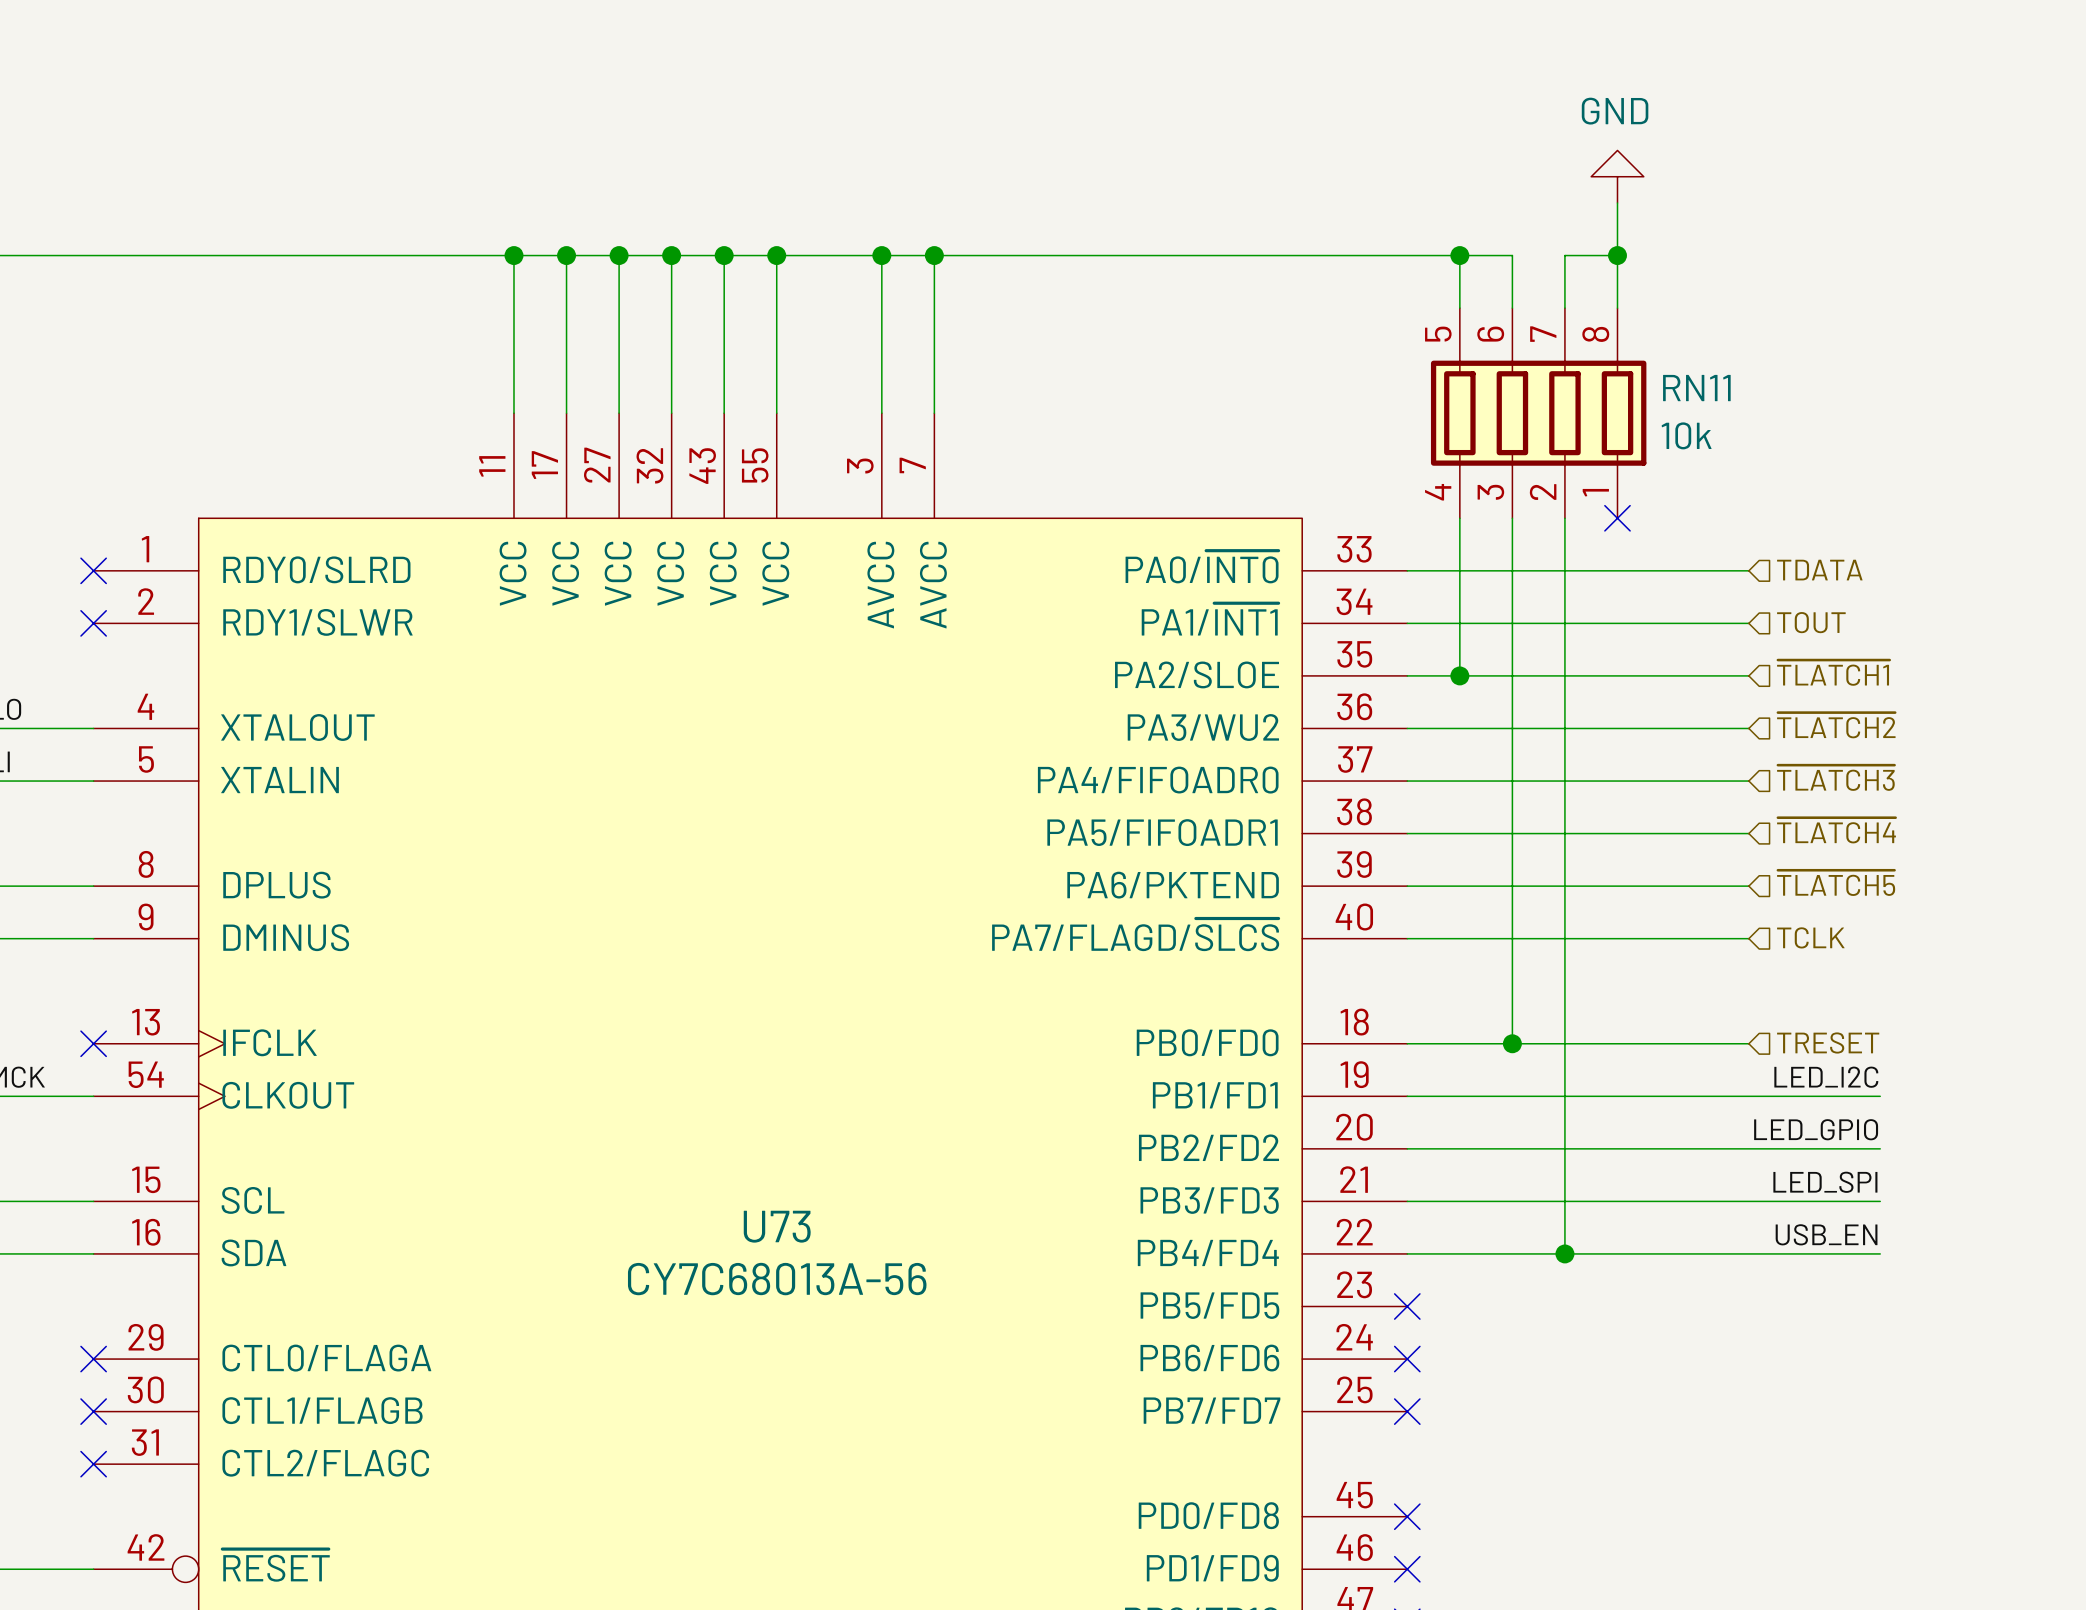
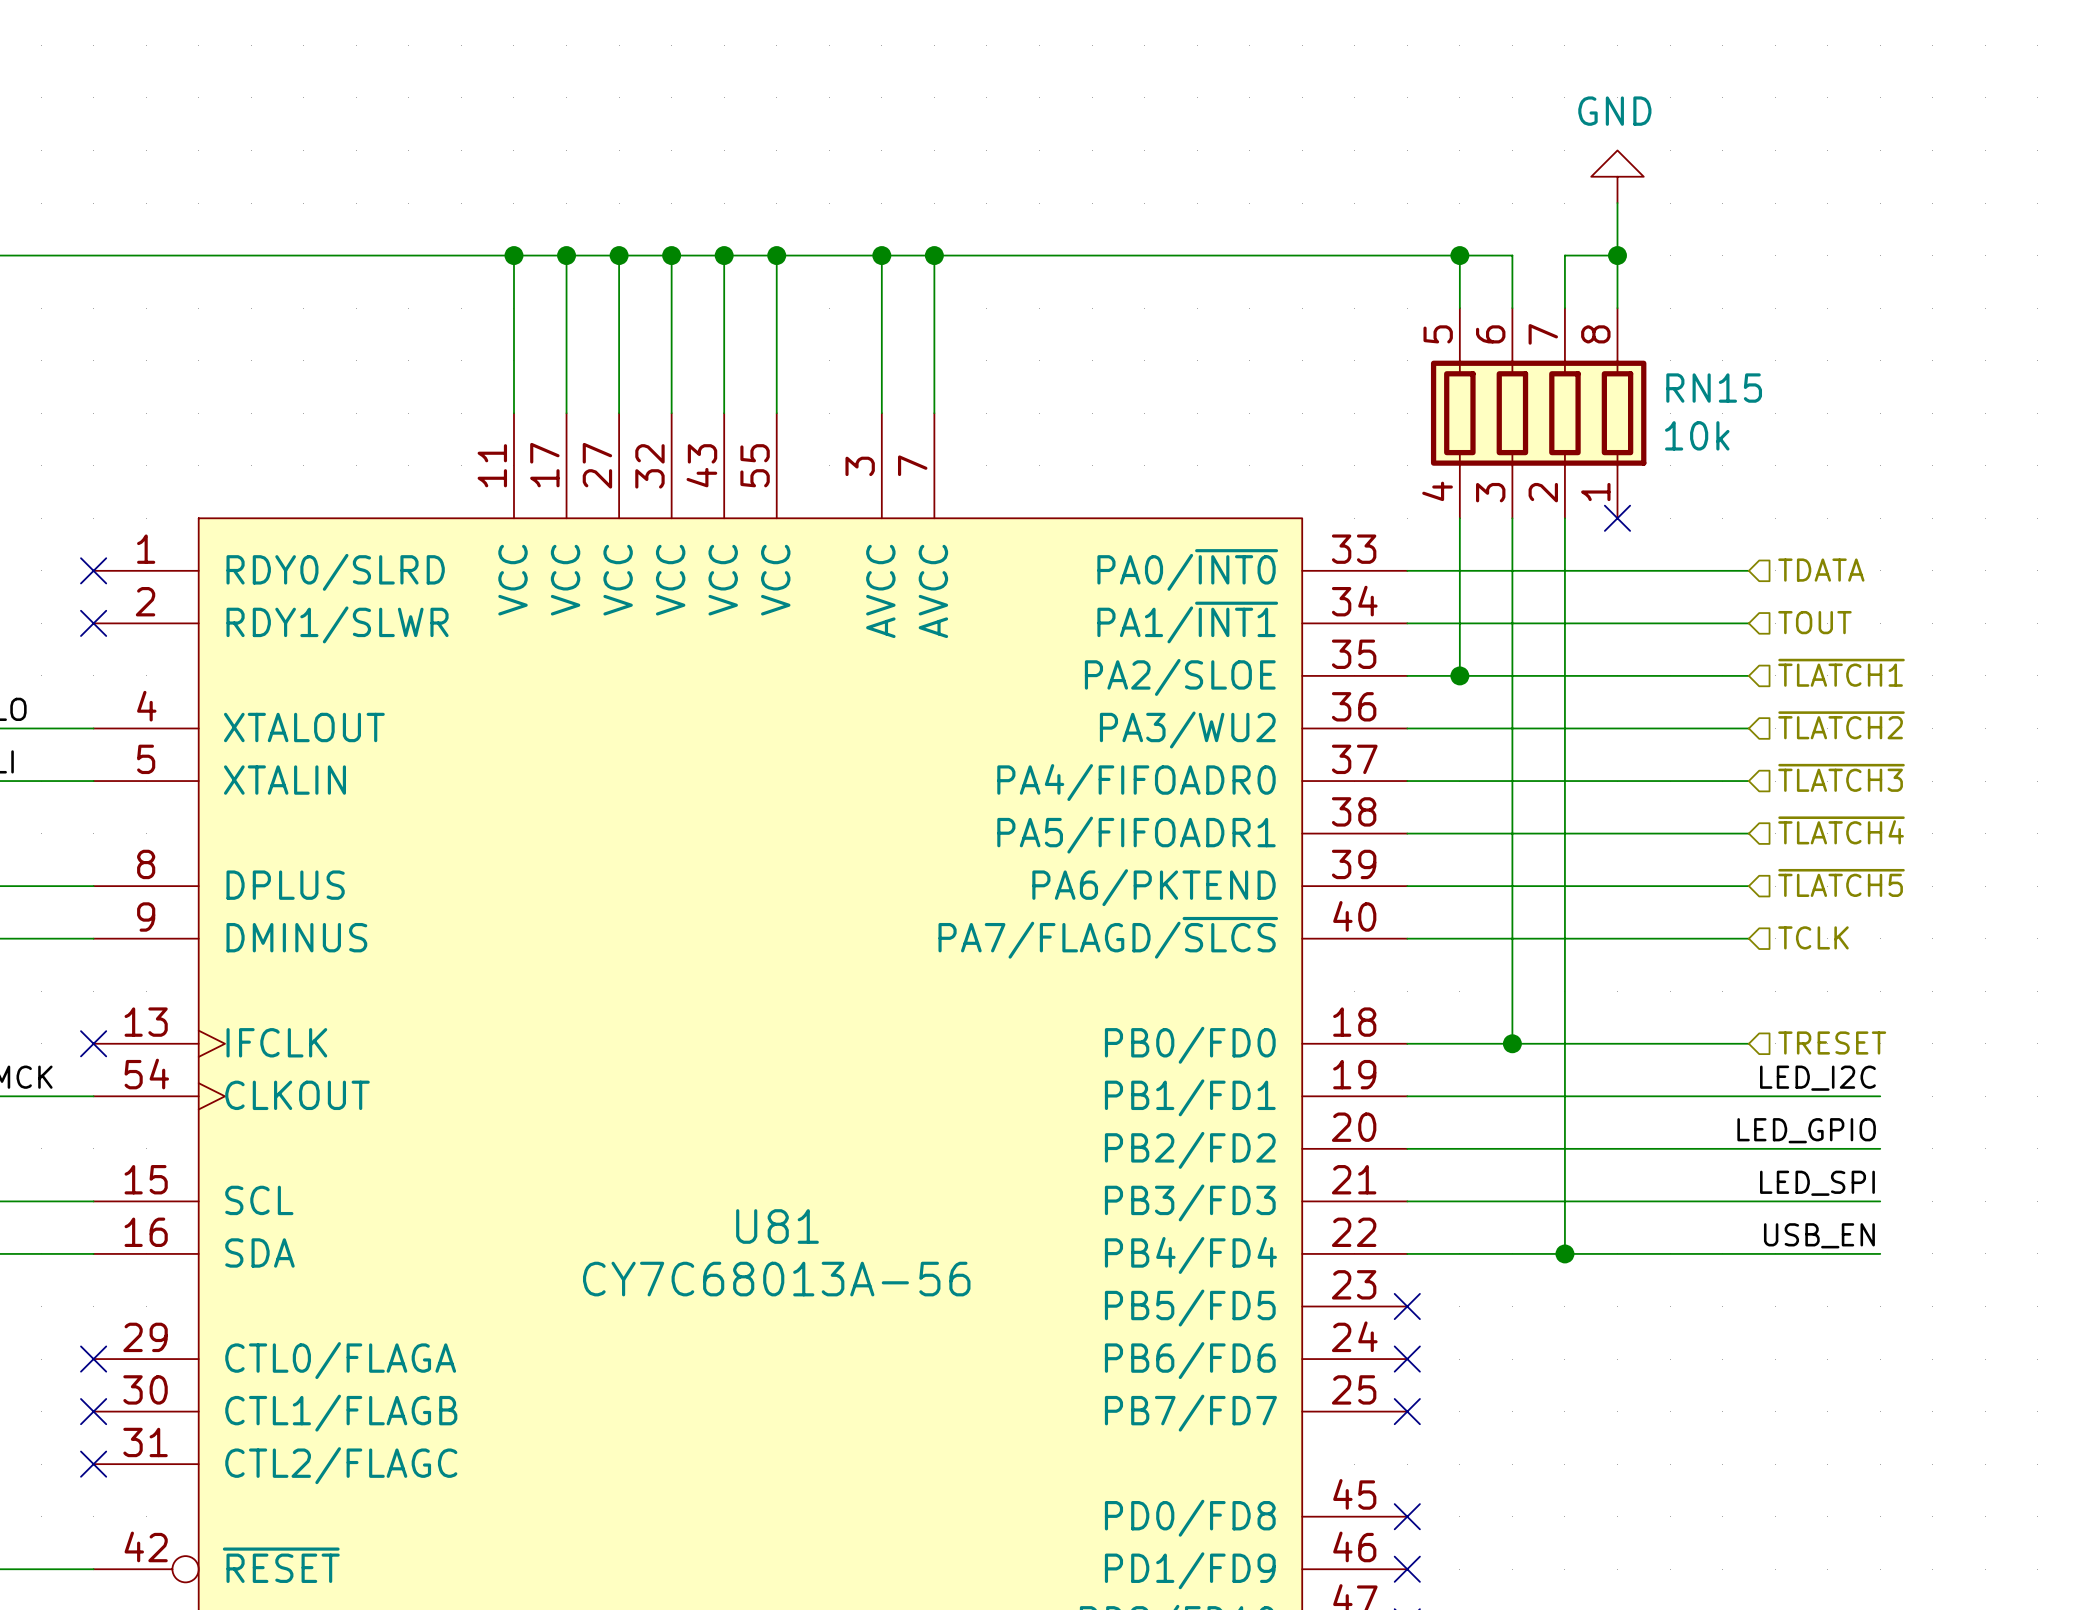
RN11 name: RN11 (1696, 388) -> RN15 (1714, 388)
U73 name: U73 (777, 1226) -> U81 (777, 1226)

